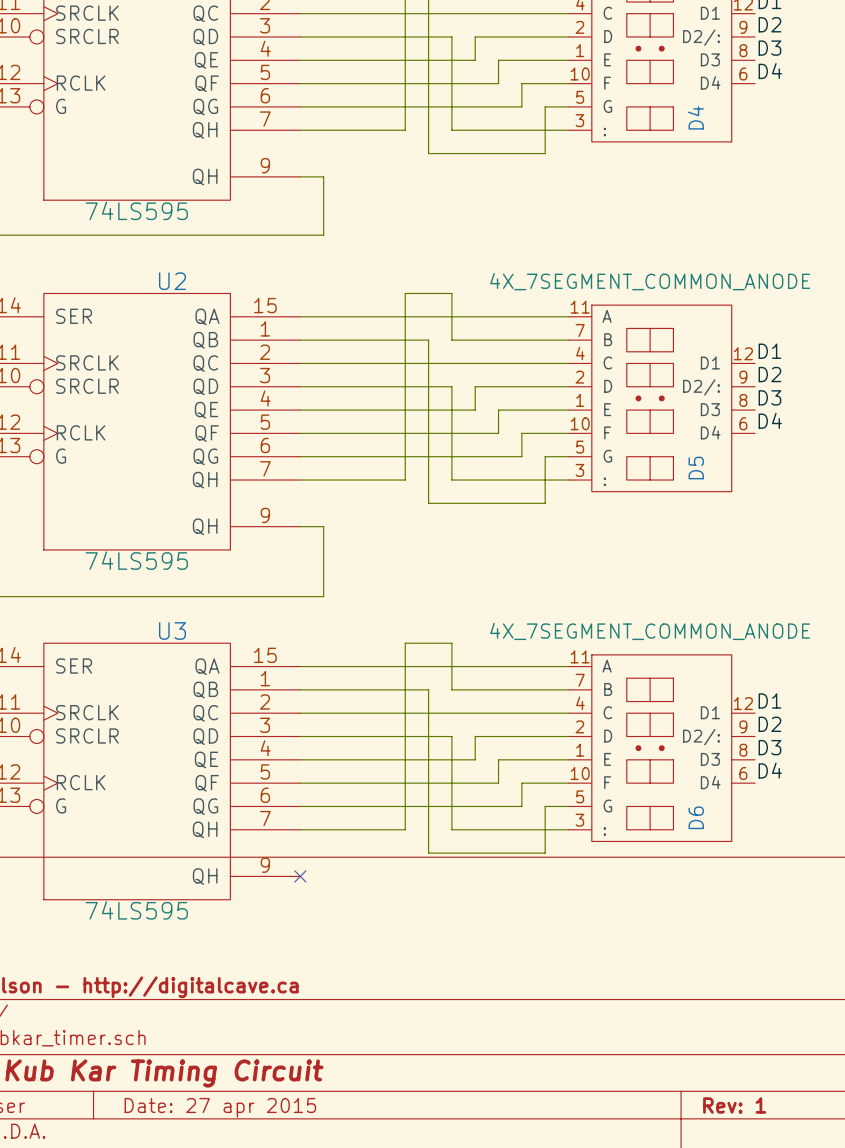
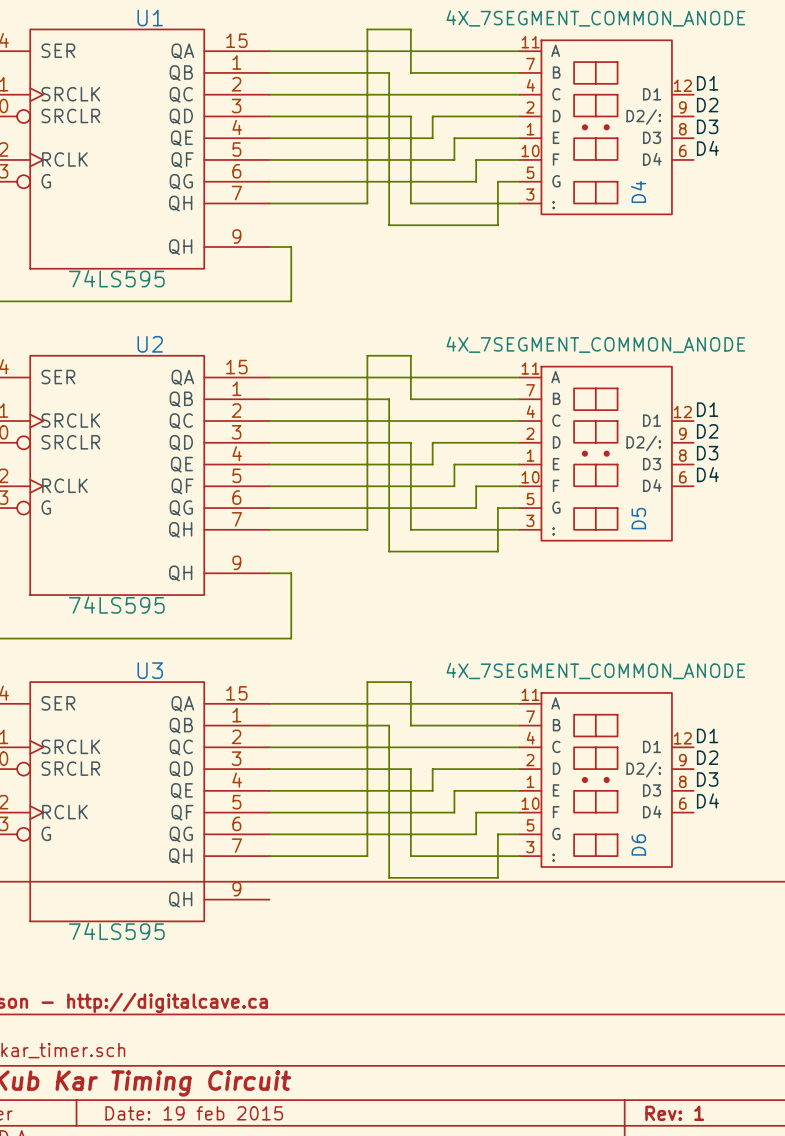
no-connect mark: (300, 876) -> none
title block: Date: 27 apr 2015 (220, 1107) -> Date: 19 feb 2015 (194, 1113)

